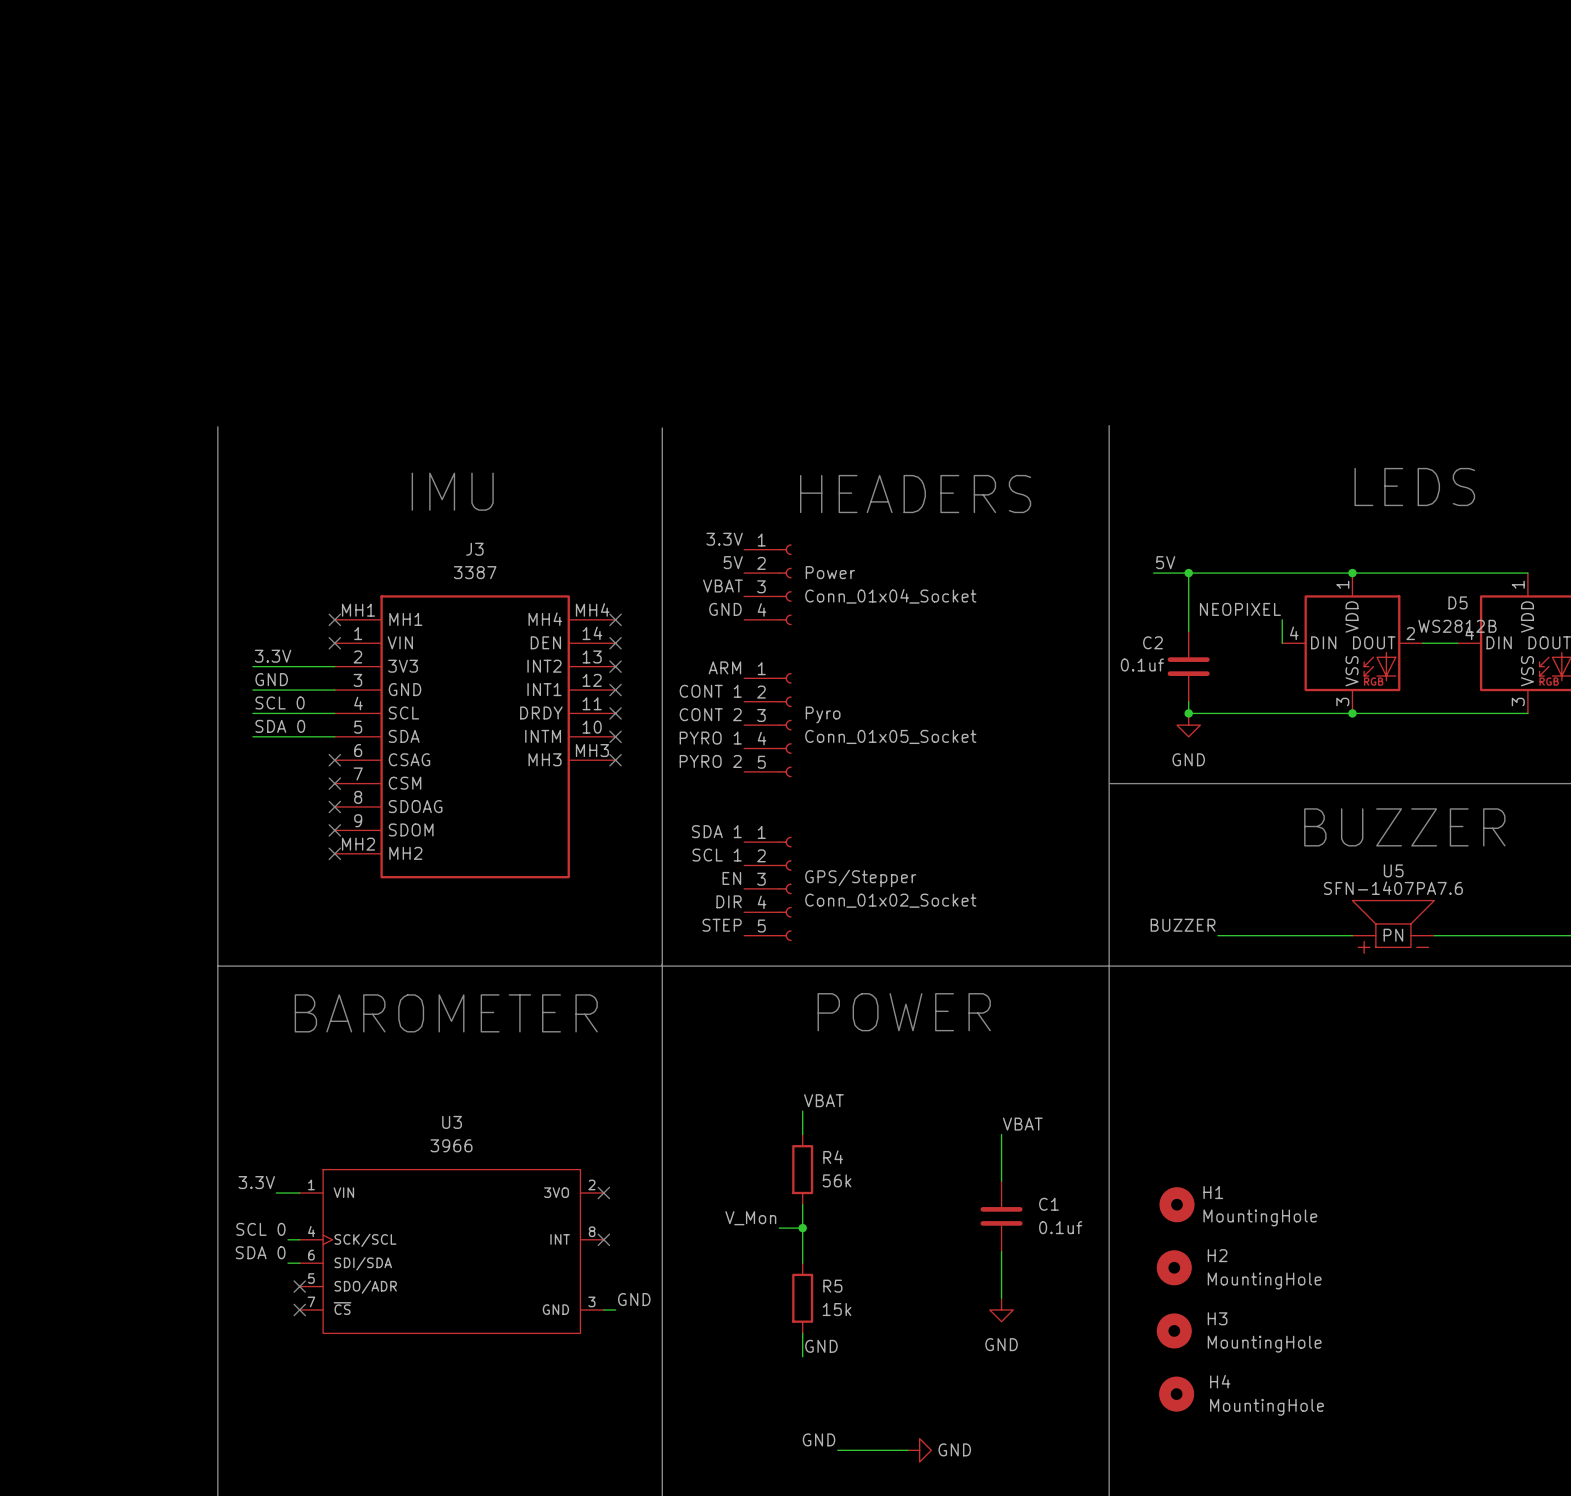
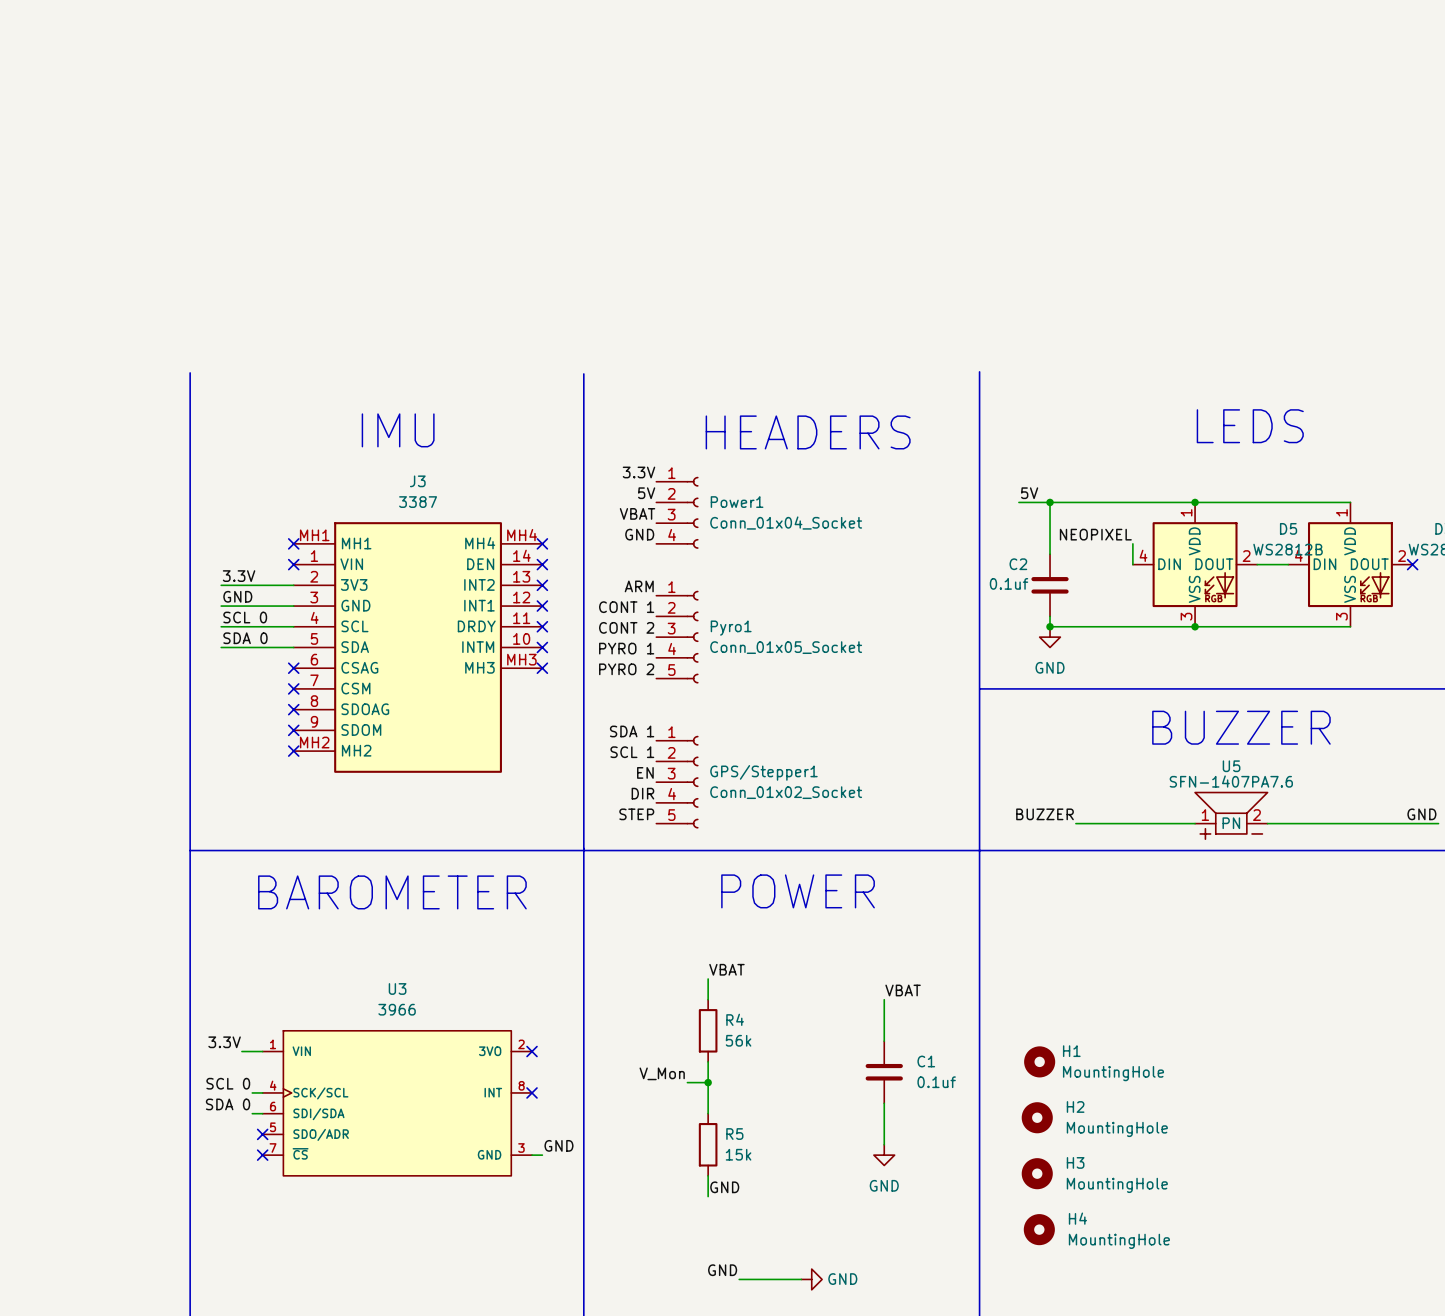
Power name: Power (830, 572) -> Power1 (737, 502)
Pyro name: Pyro (823, 714) -> Pyro1 (731, 628)
GPS/Stepper name: GPS/Stepper (860, 878) -> GPS/Stepper1 (763, 772)
U5 pin number: none -> 1 (1205, 815)
U5 pin number: none -> 2 (1256, 815)

